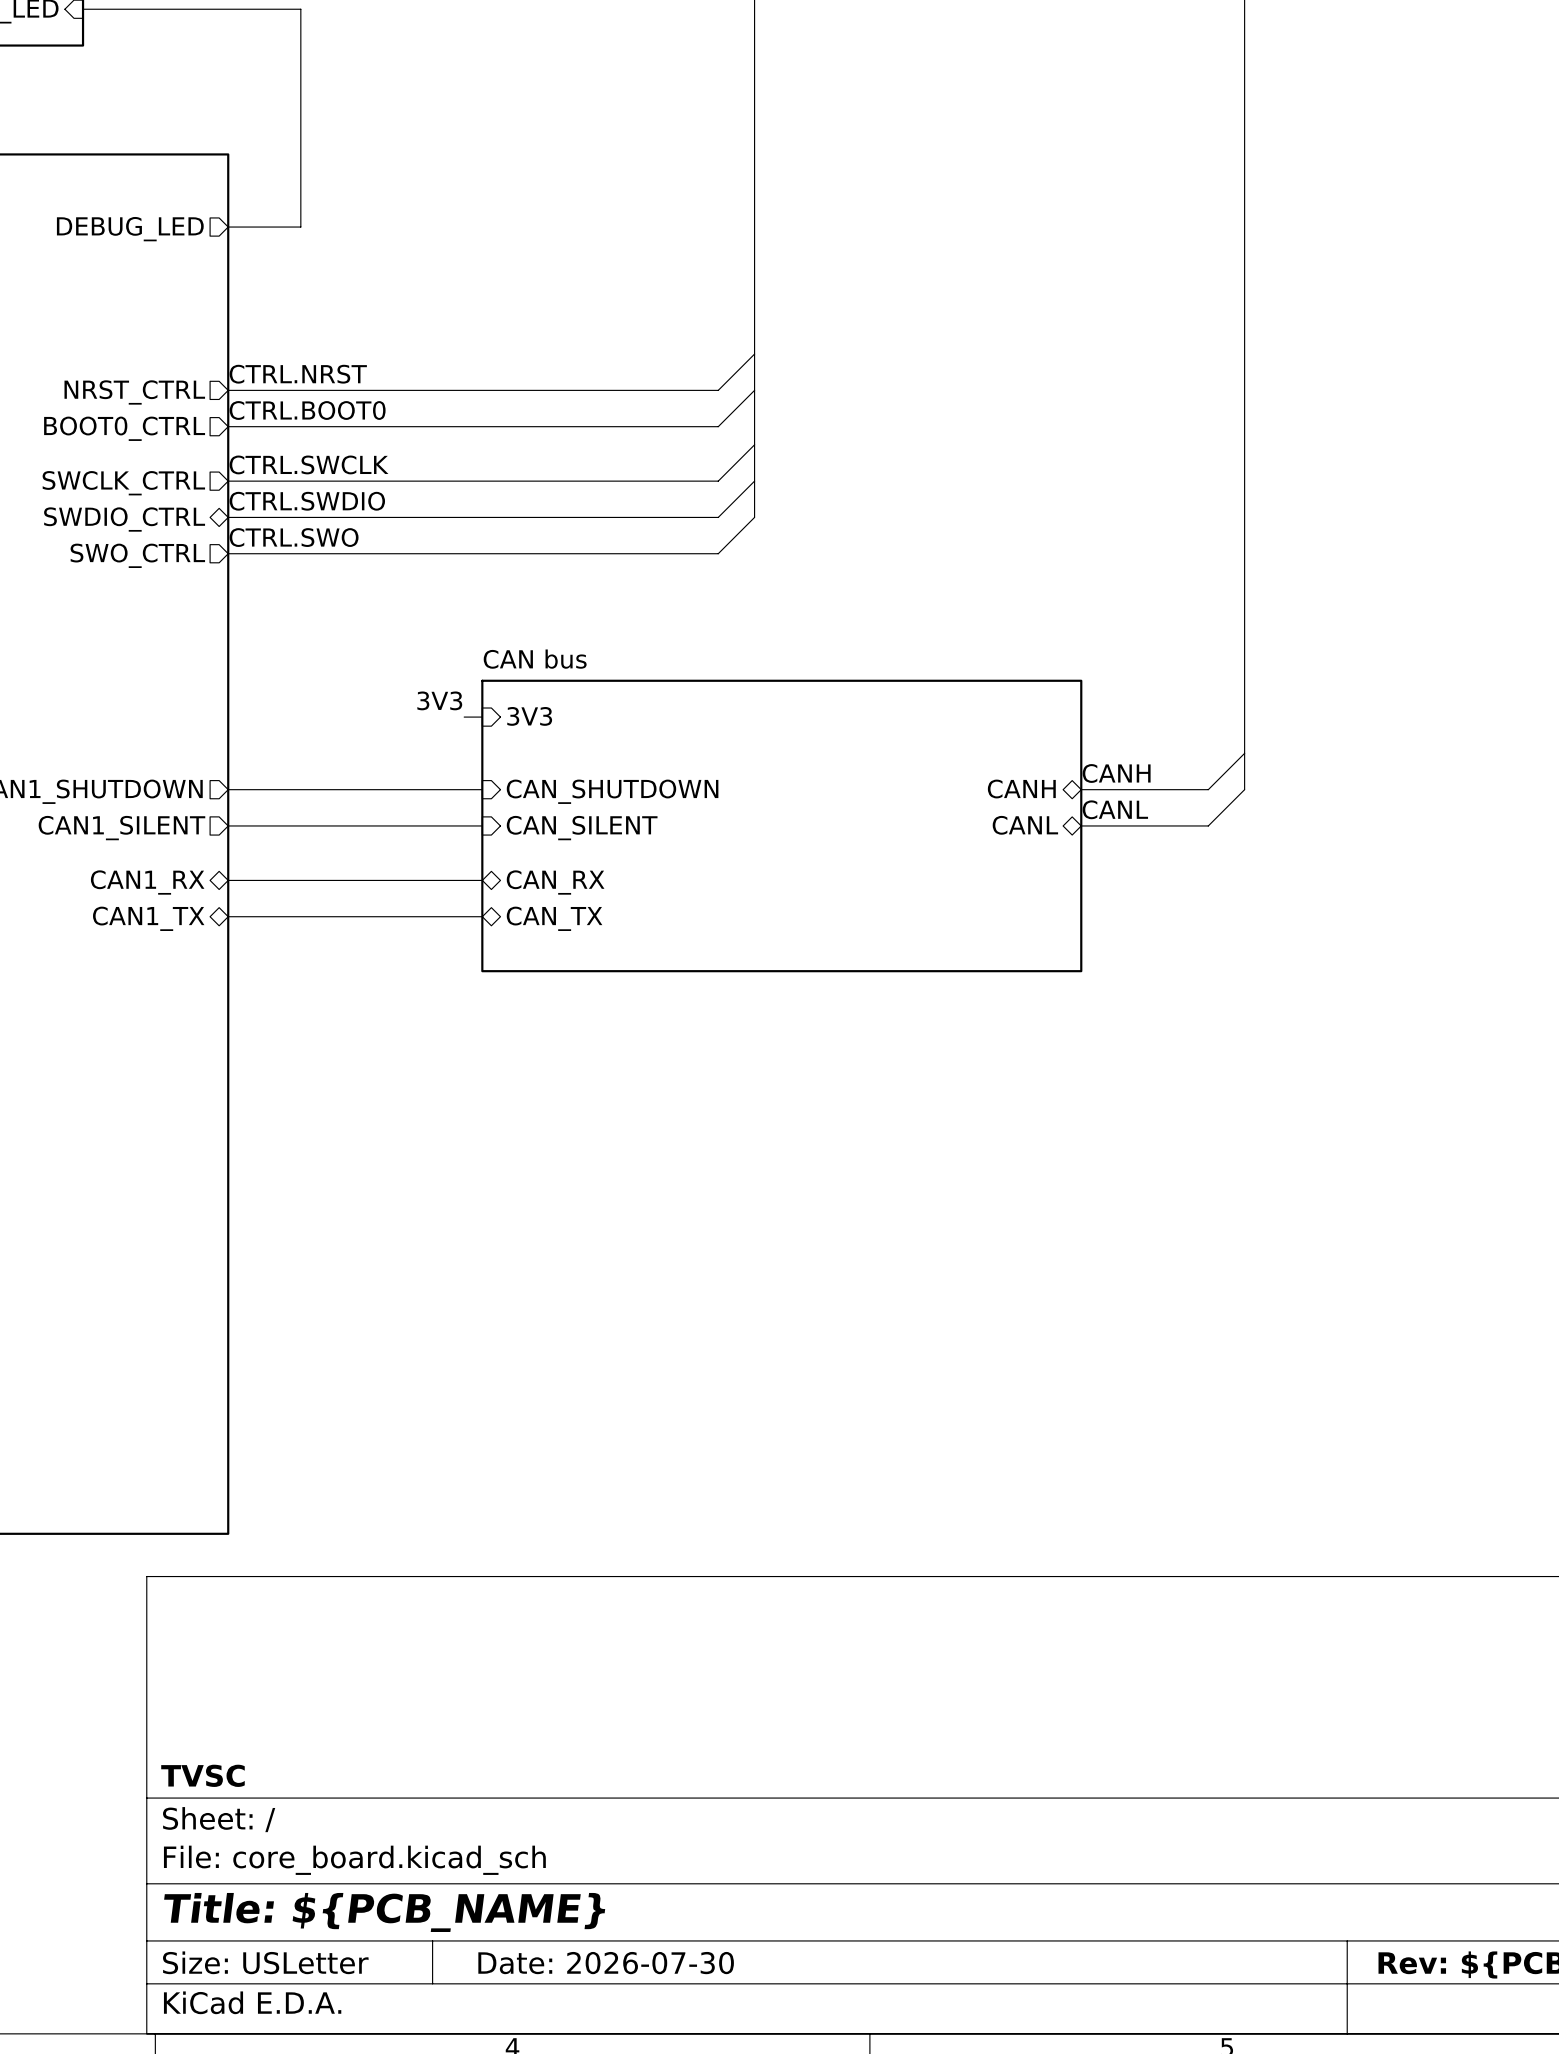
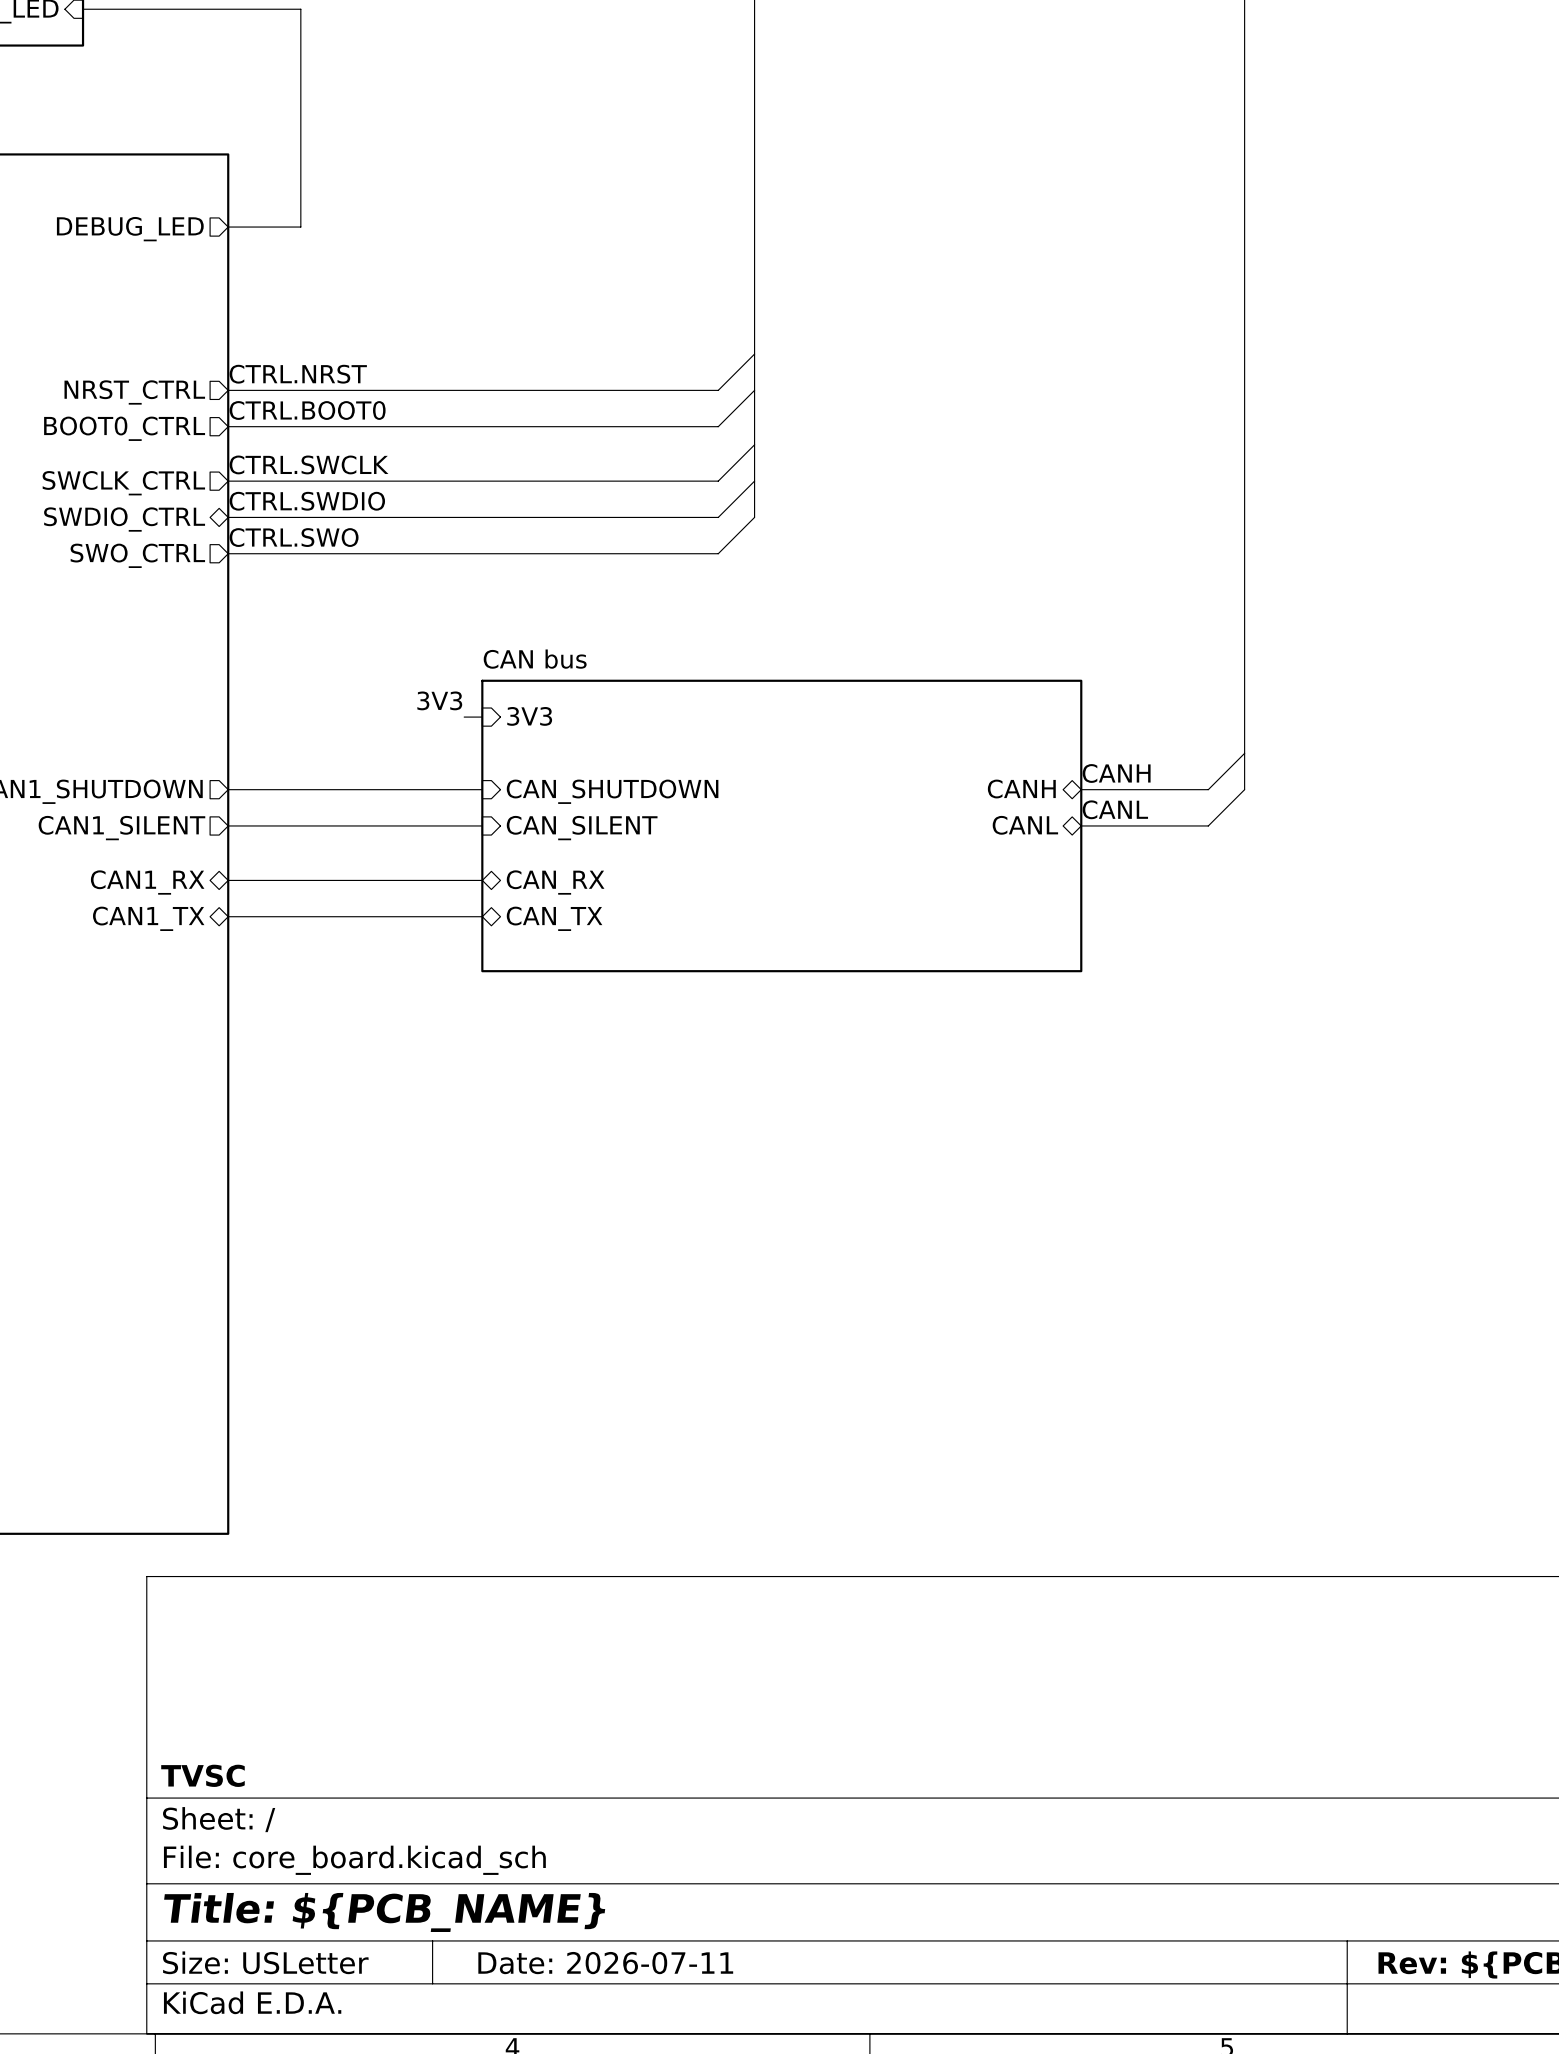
title block: Date: 2026-07-30 (606, 1963) -> Date: 2026-07-11 (605, 1963)

